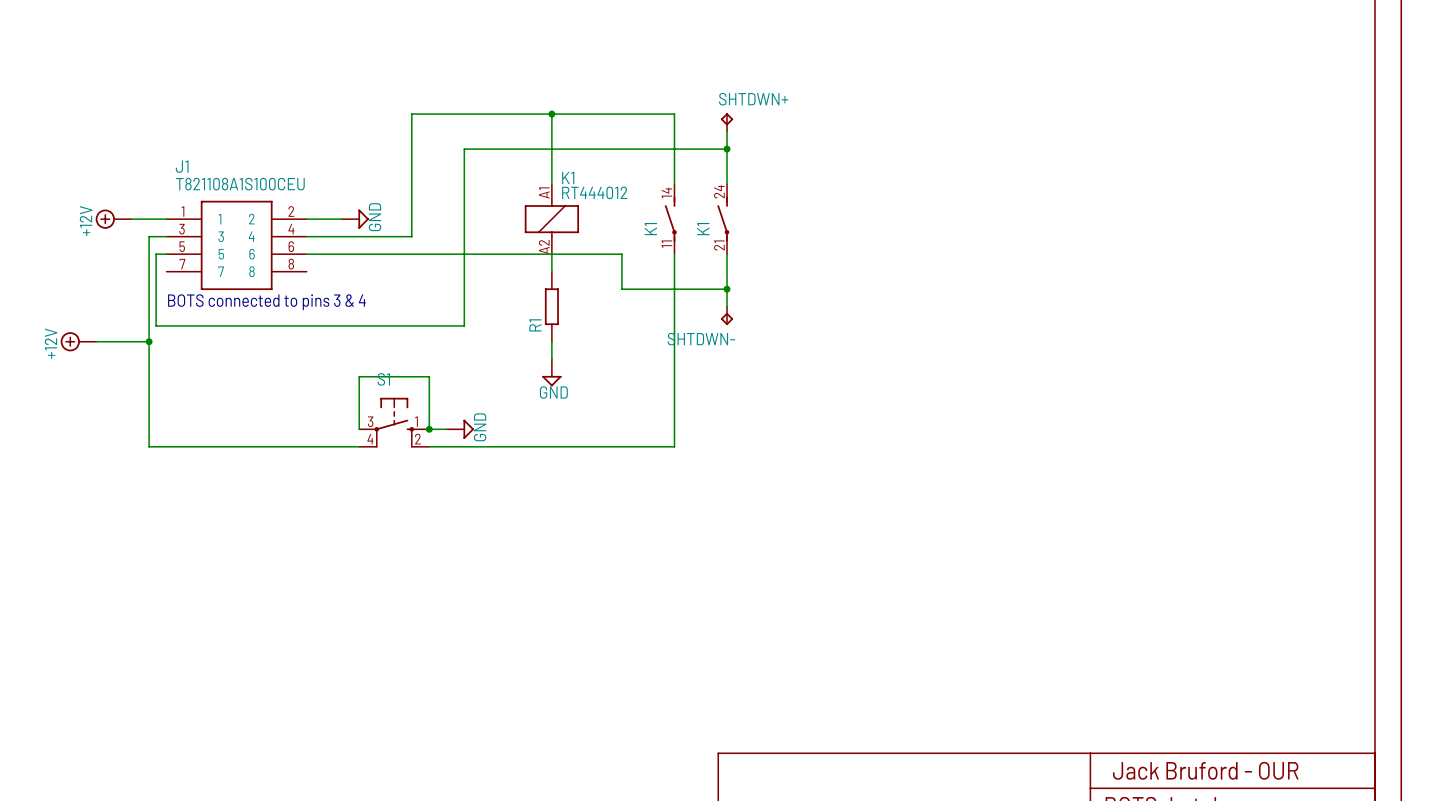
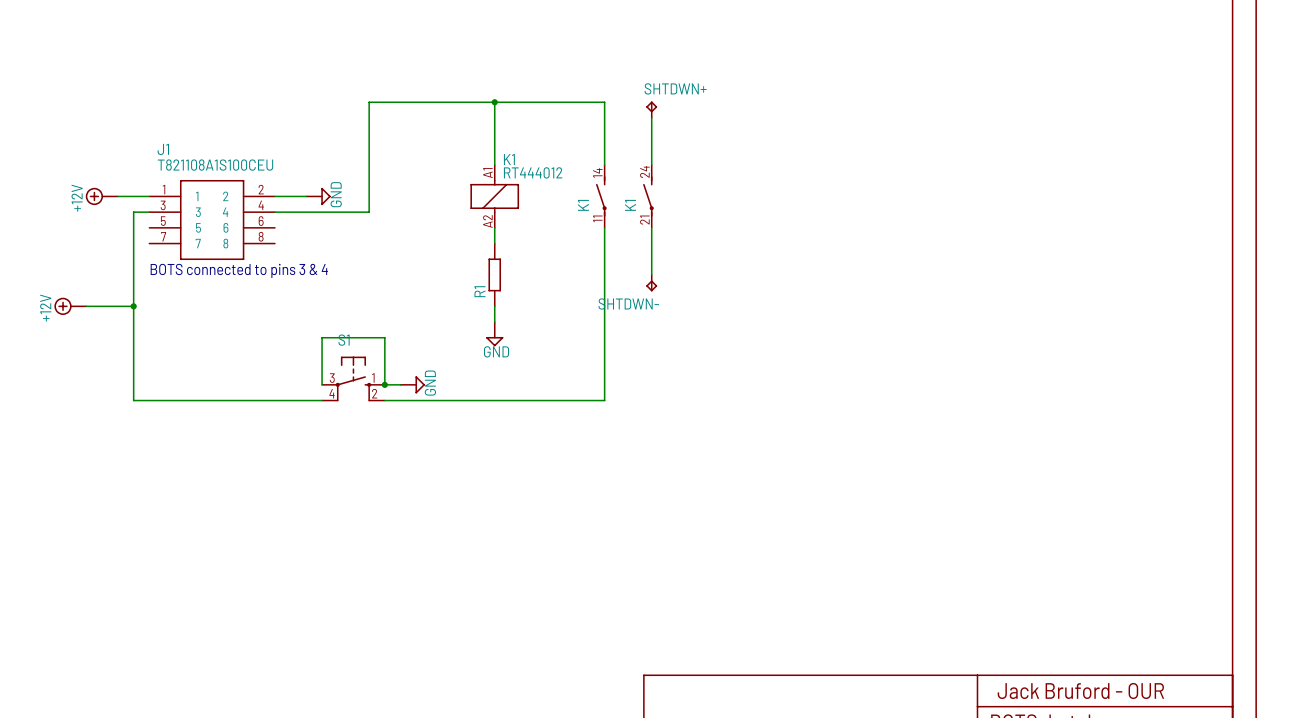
wire: (727, 149) (464, 149) (464, 325) (156, 325) (156, 254) (166, 254) -> none
junction: (727, 149) -> none
wire: (306, 254) (621, 254) (621, 289) (727, 289) -> none
junction: (727, 289) -> none

